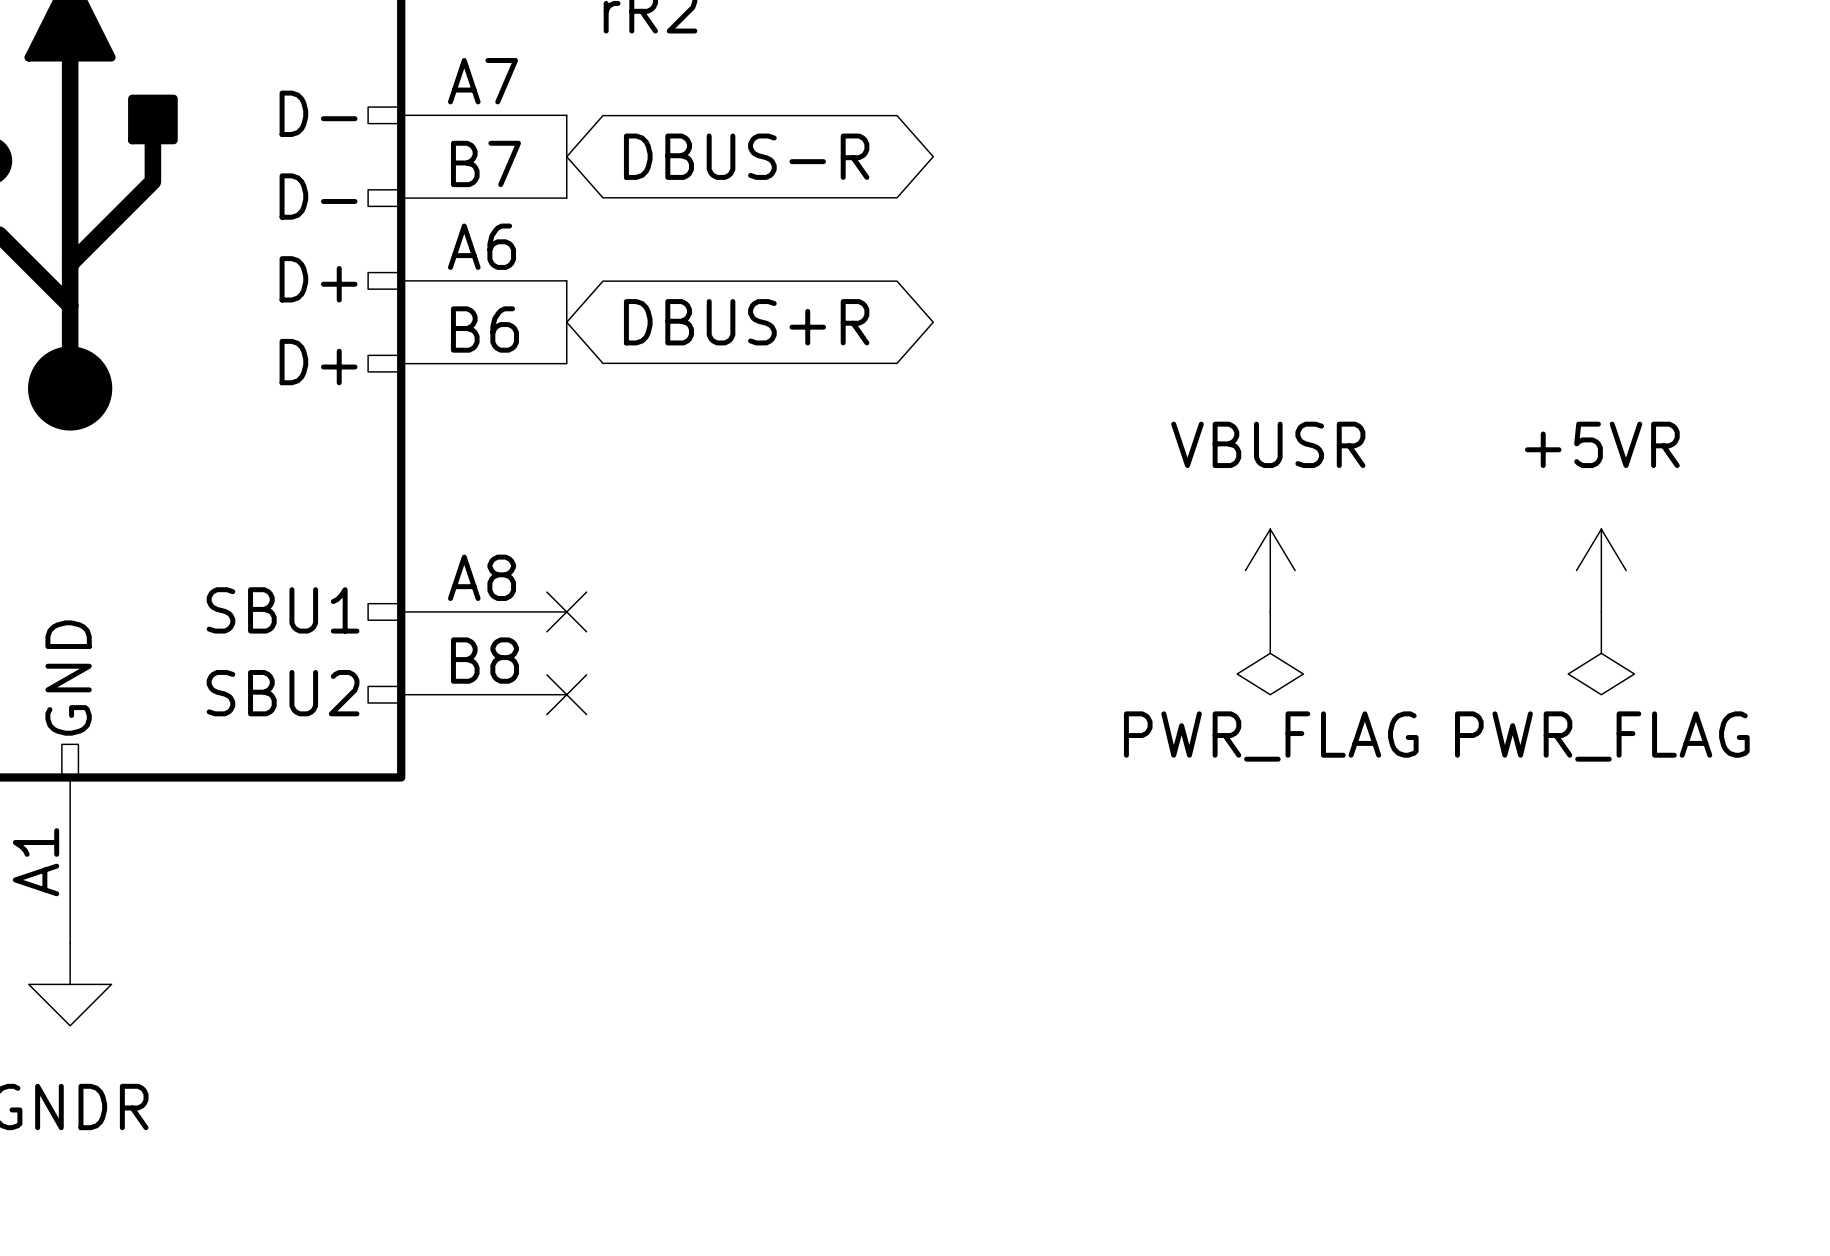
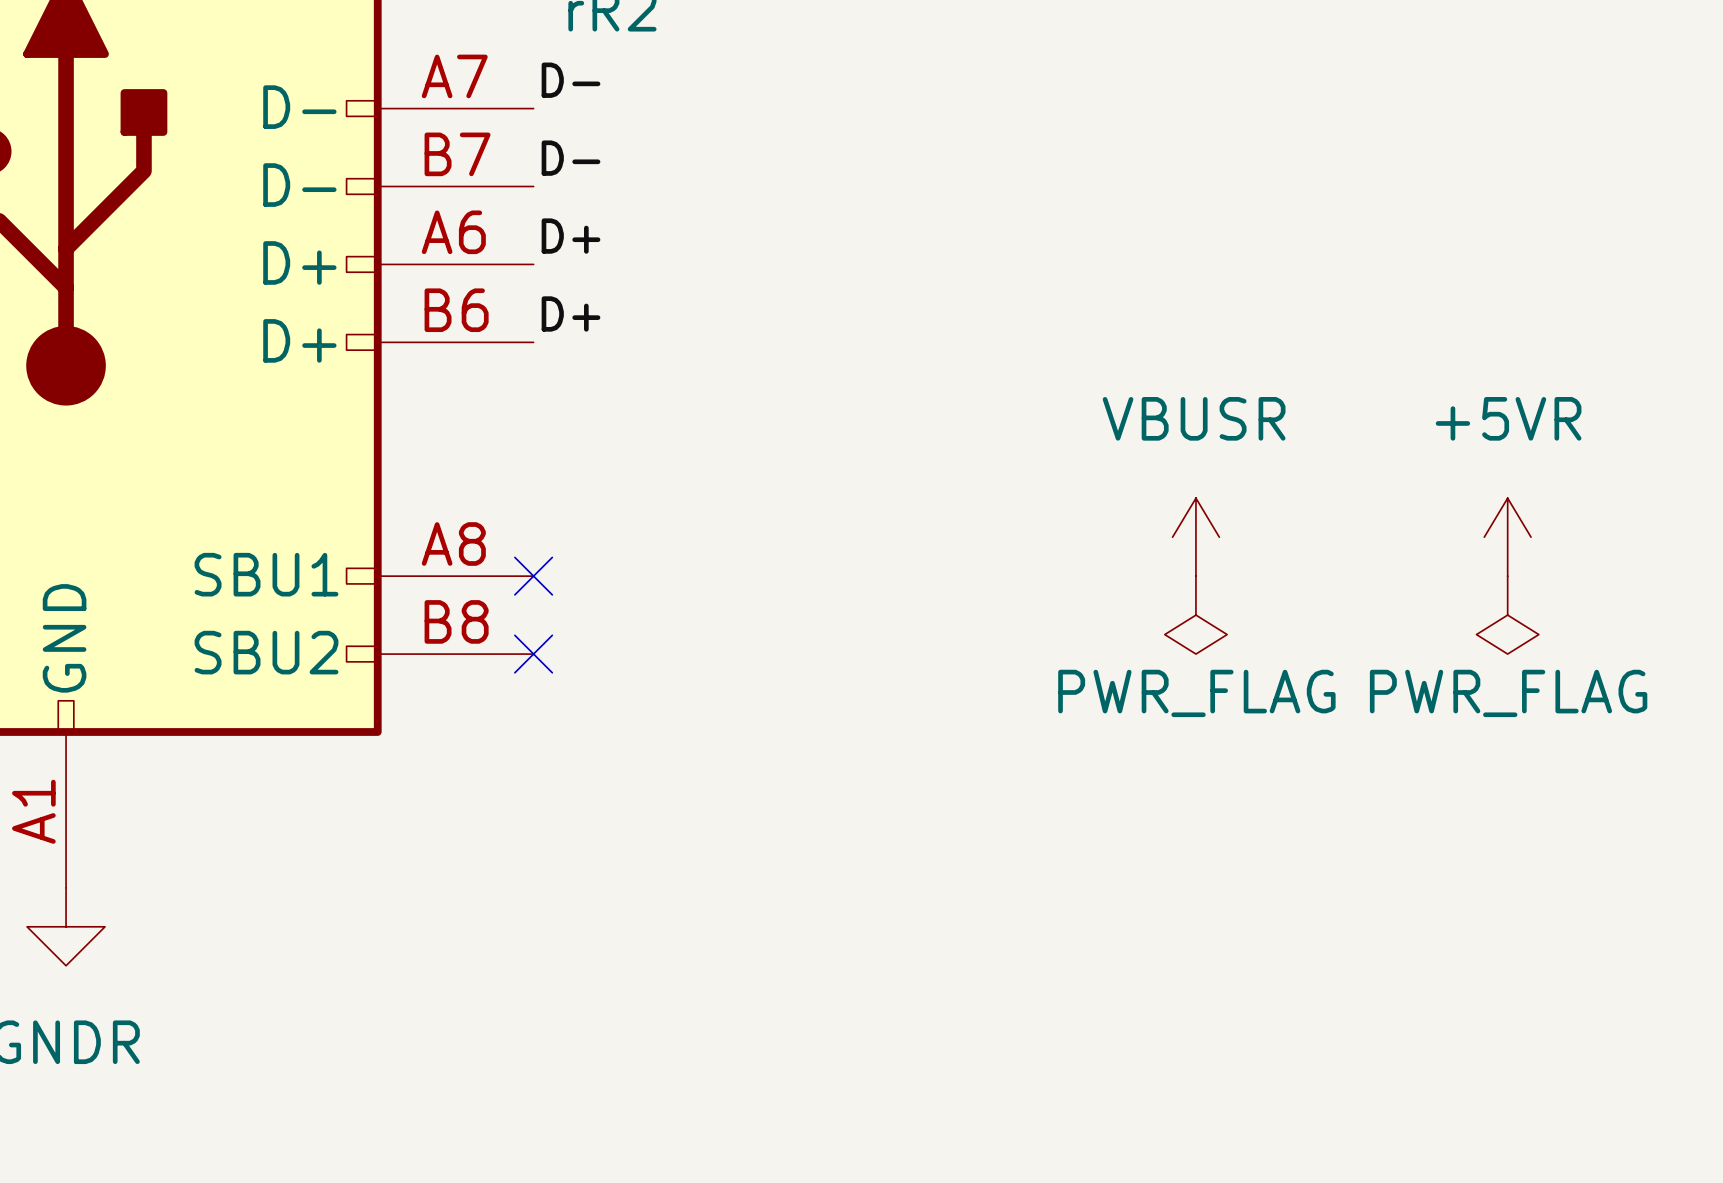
label: none -> D- (571, 80)
wire: (566, 115) (566, 198) -> none
global label: DBUS-R (746, 156) -> none
label: none -> D- (571, 158)
label: none -> D+ (571, 236)
wire: (566, 280) (566, 363) -> none
global label: DBUS+R (746, 322) -> none
label: none -> D+ (571, 313)

